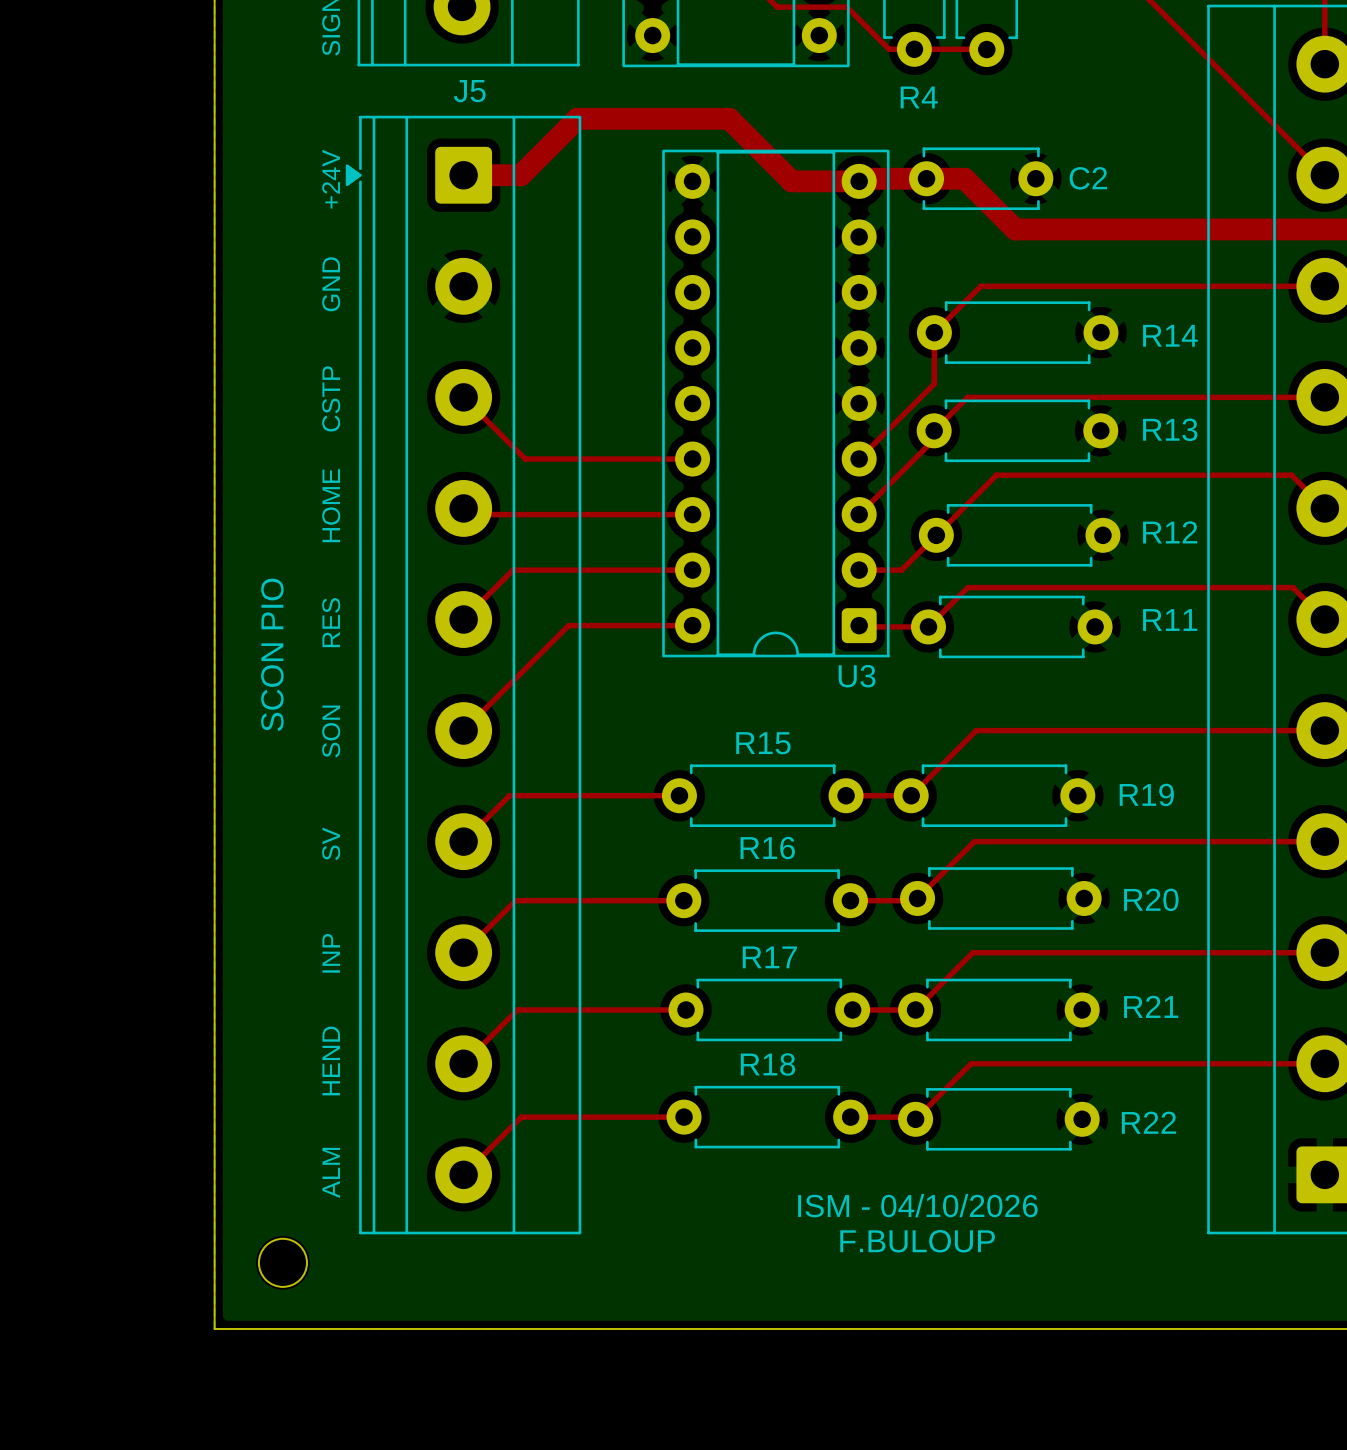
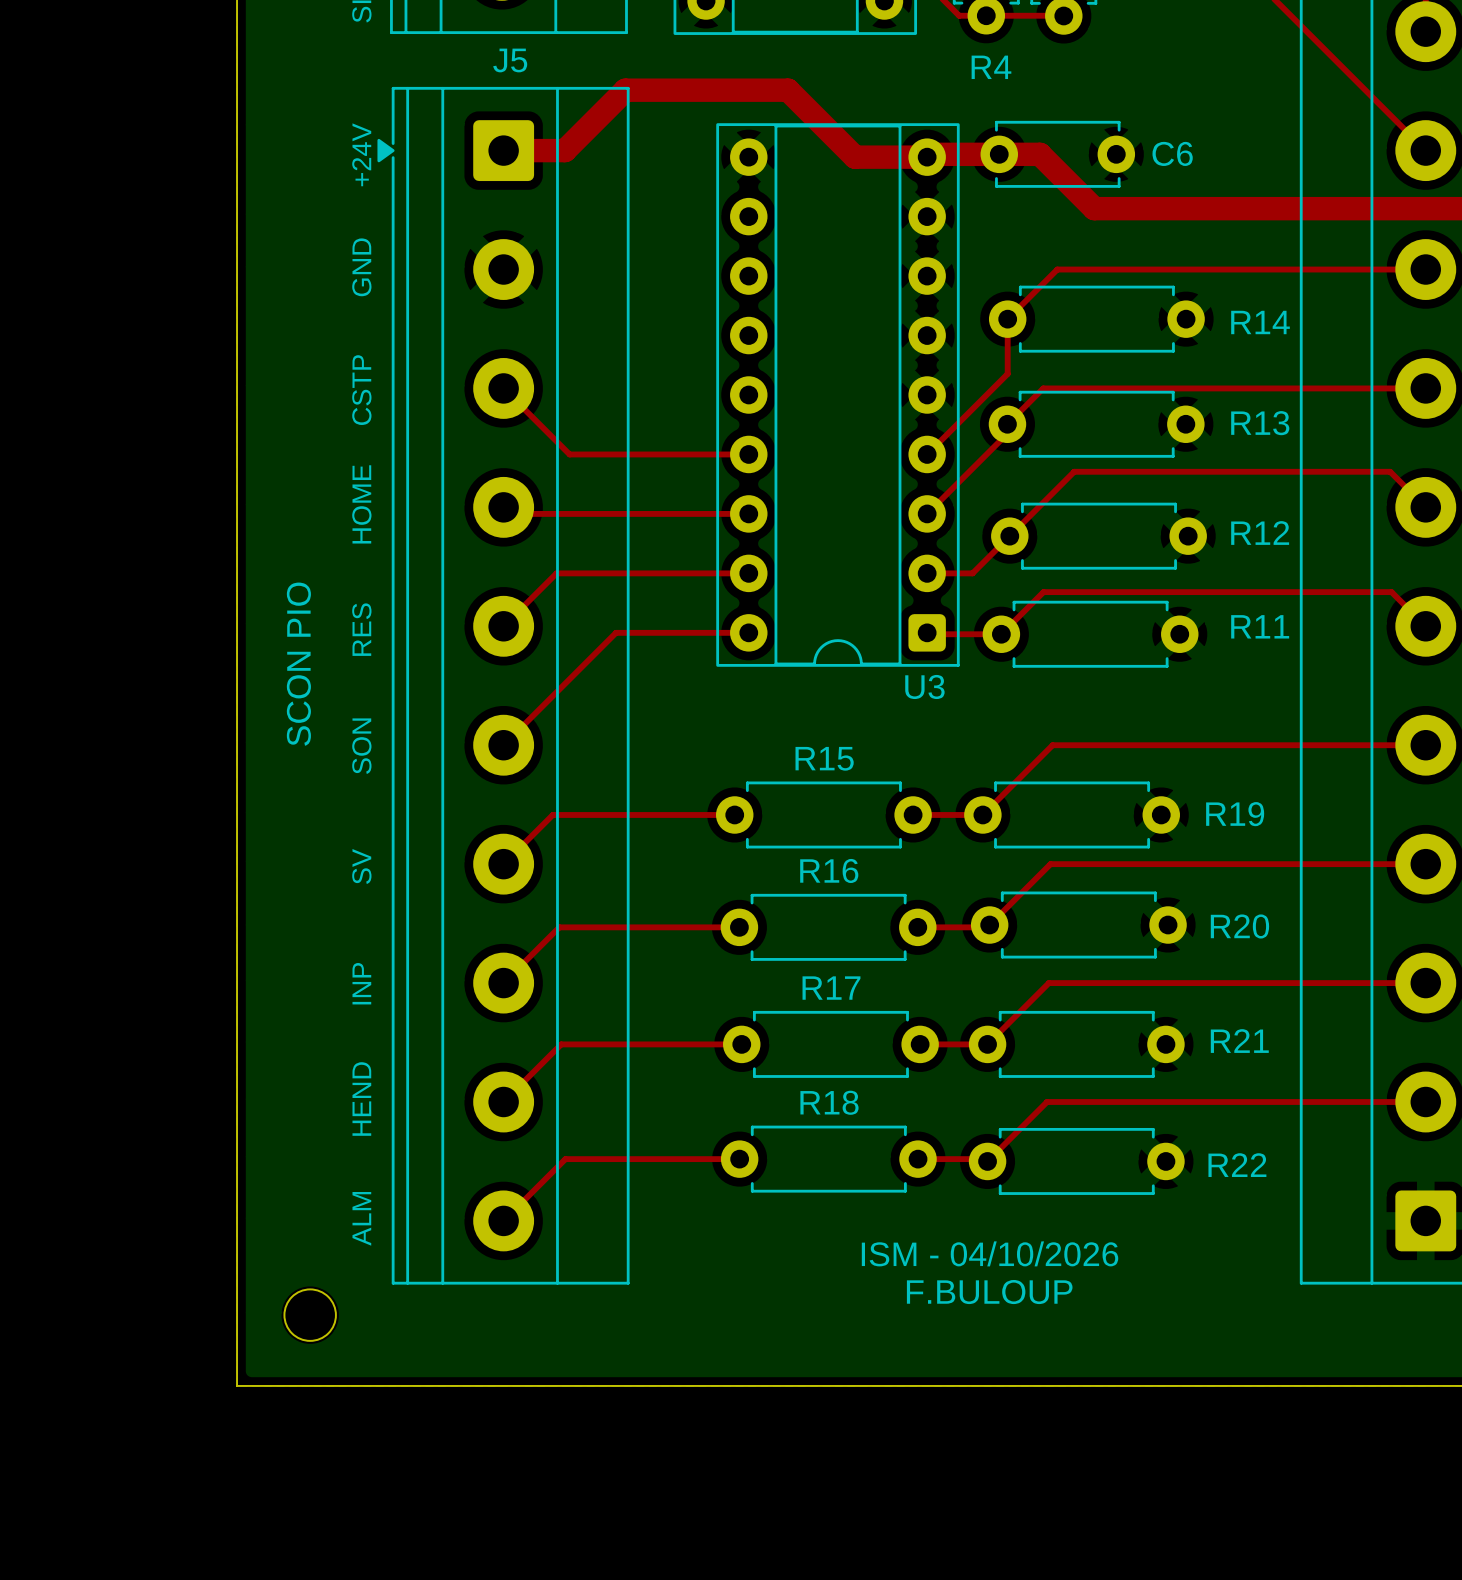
C2 name: C2 (1088, 178) -> C6 (1172, 153)

